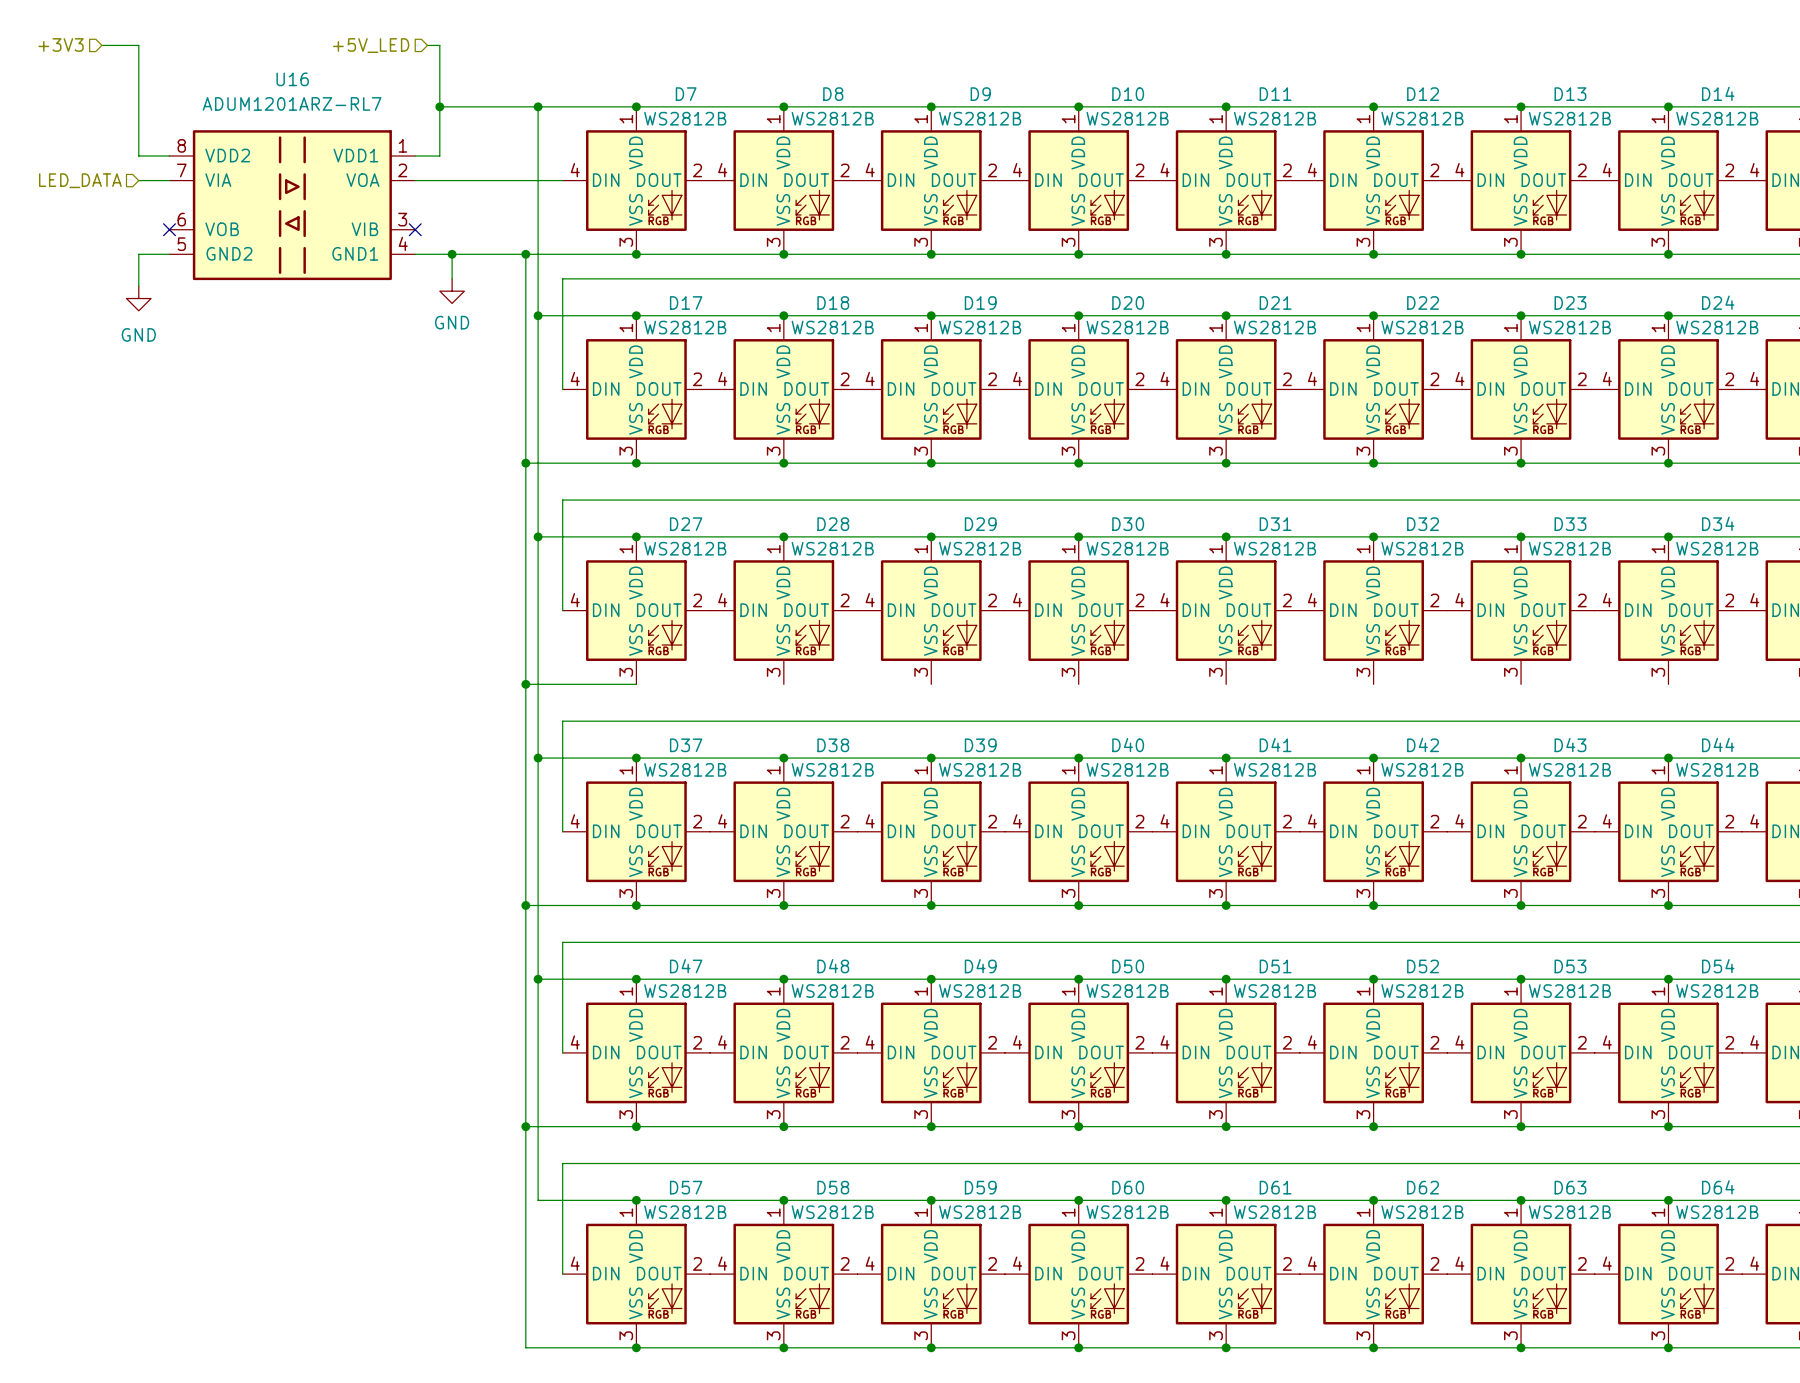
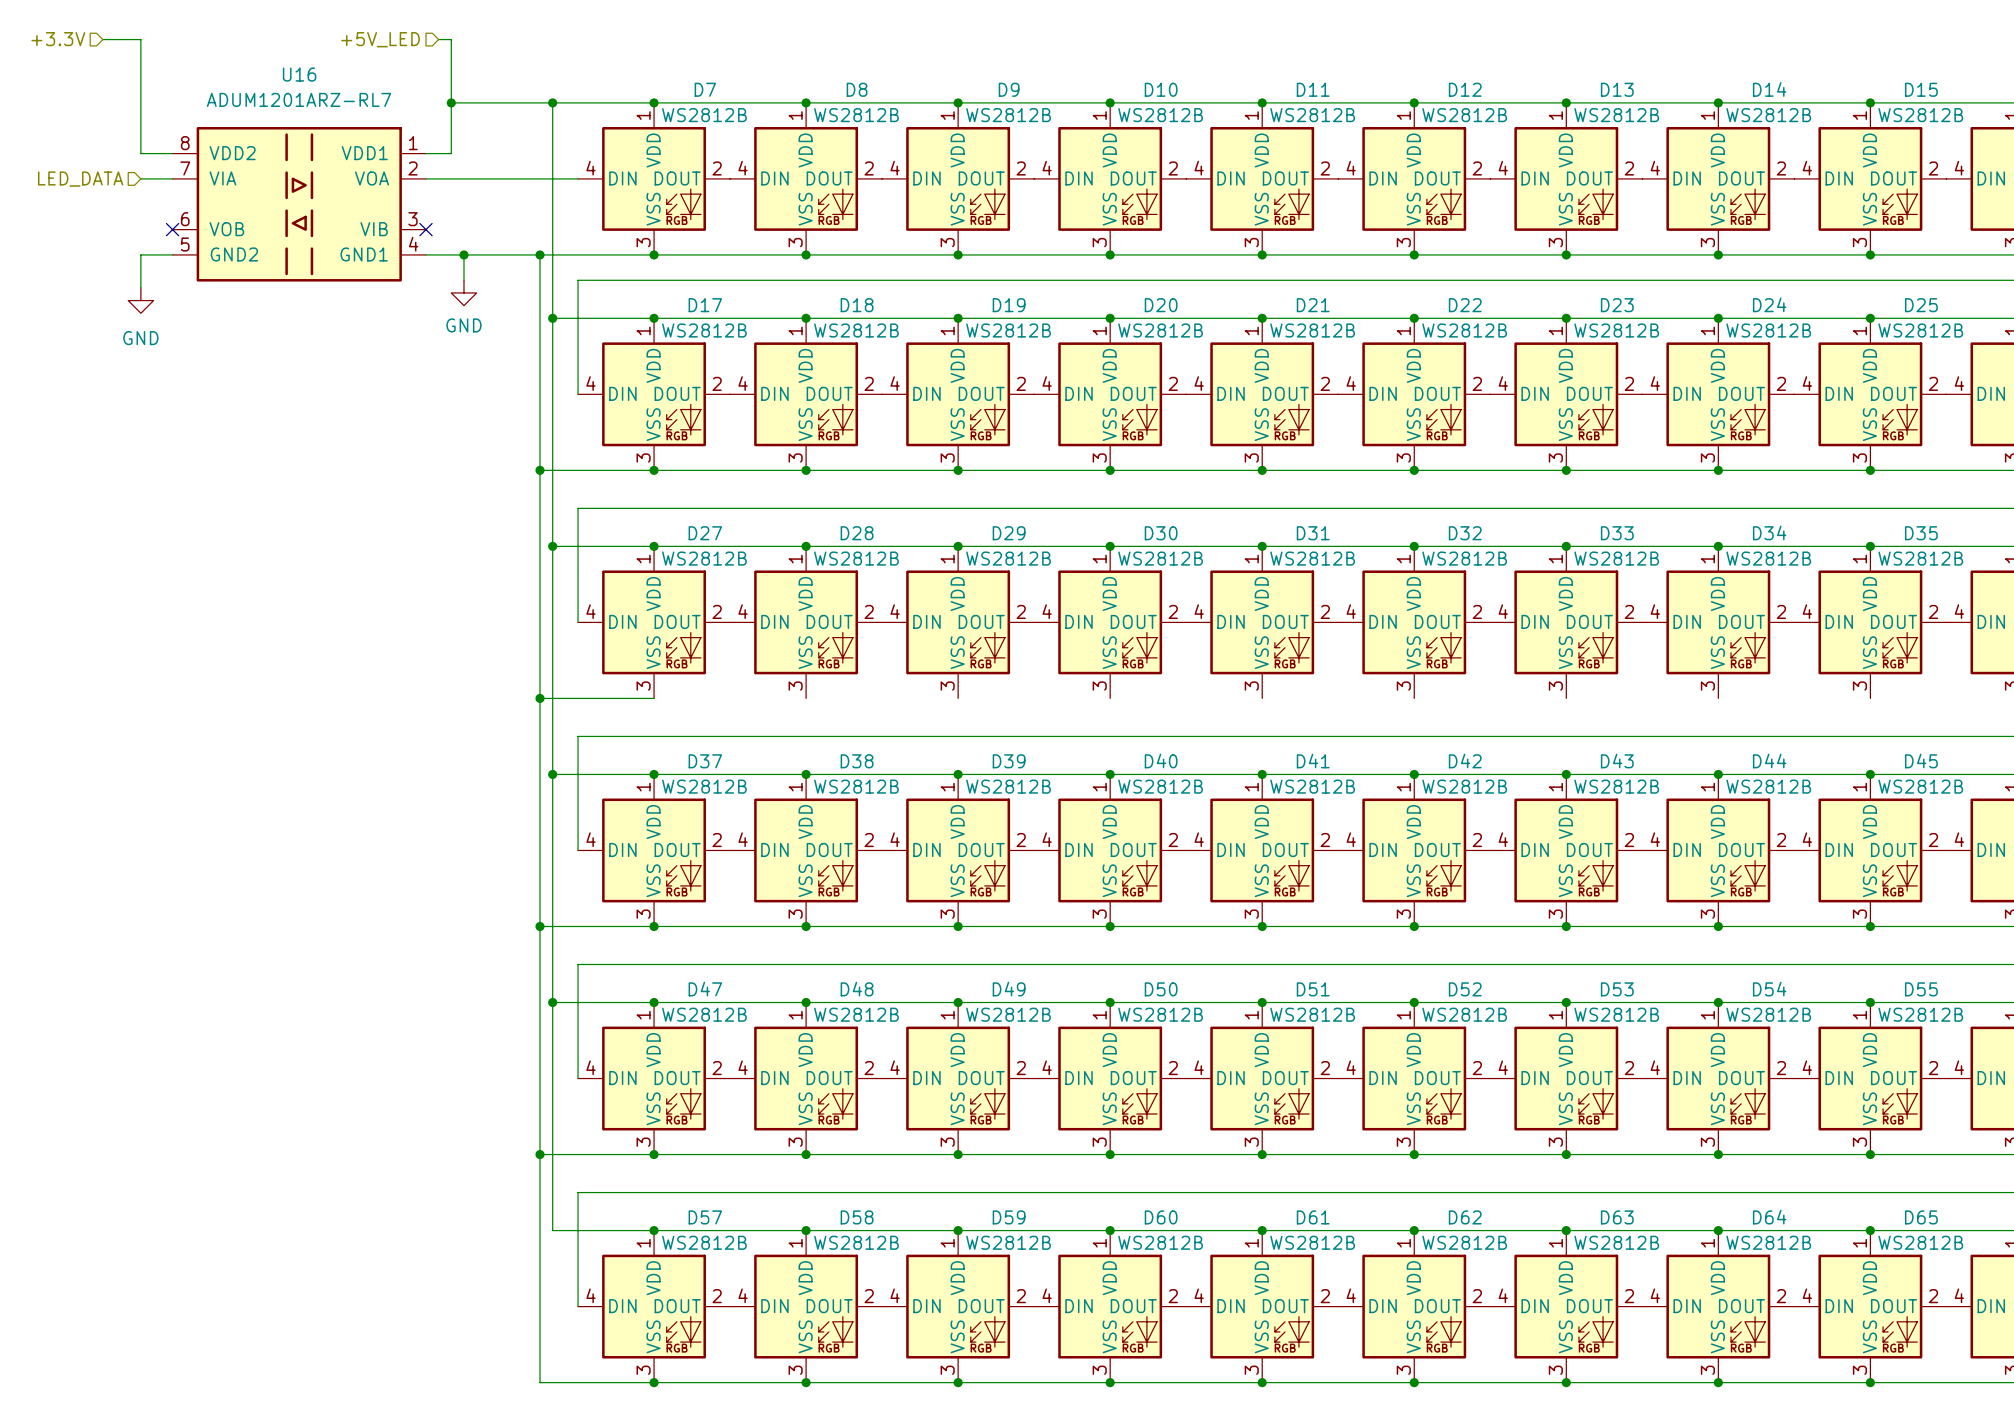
hierarchical label: +3V3 (61, 44) -> +3.3V (58, 39)

